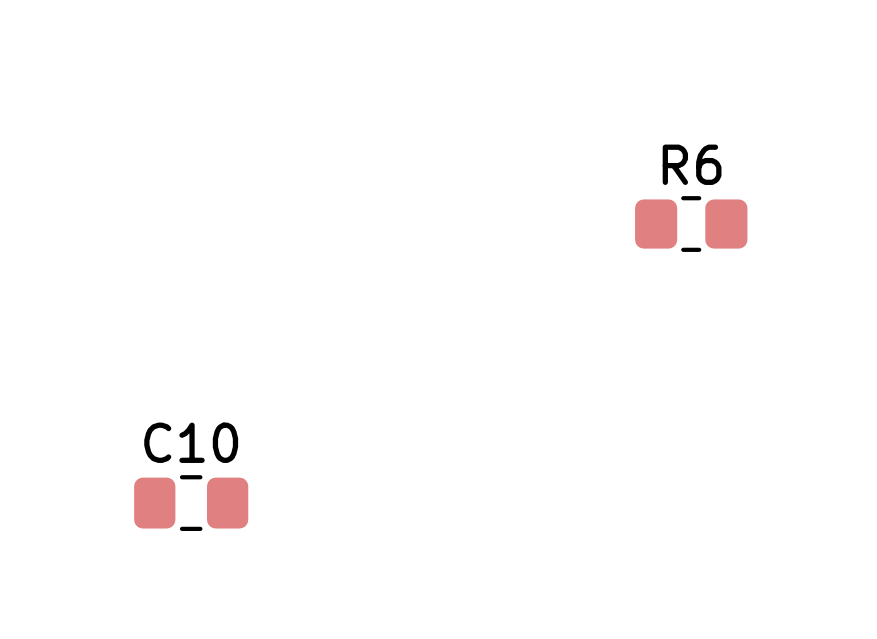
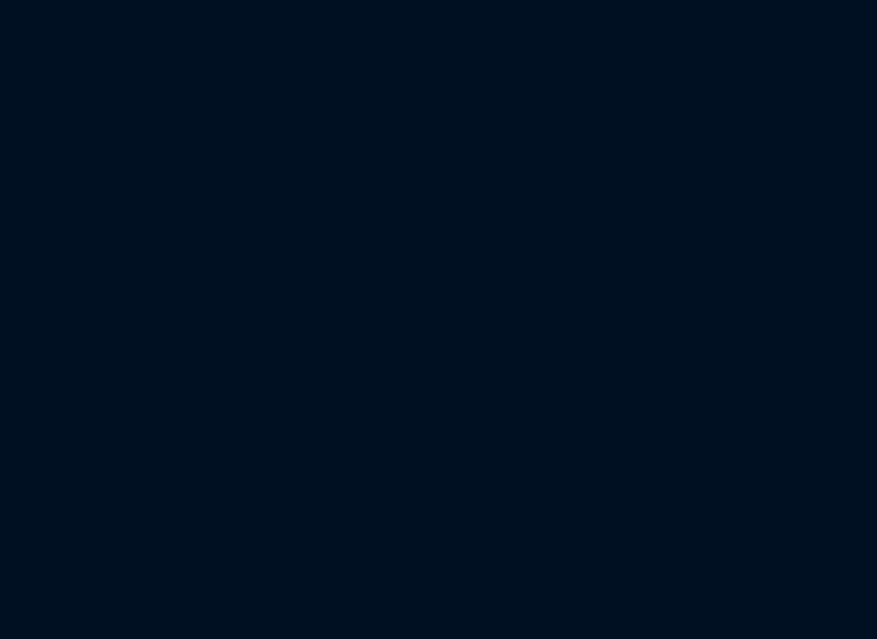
R6: (691, 224) -> none
C10: (191, 503) -> none

